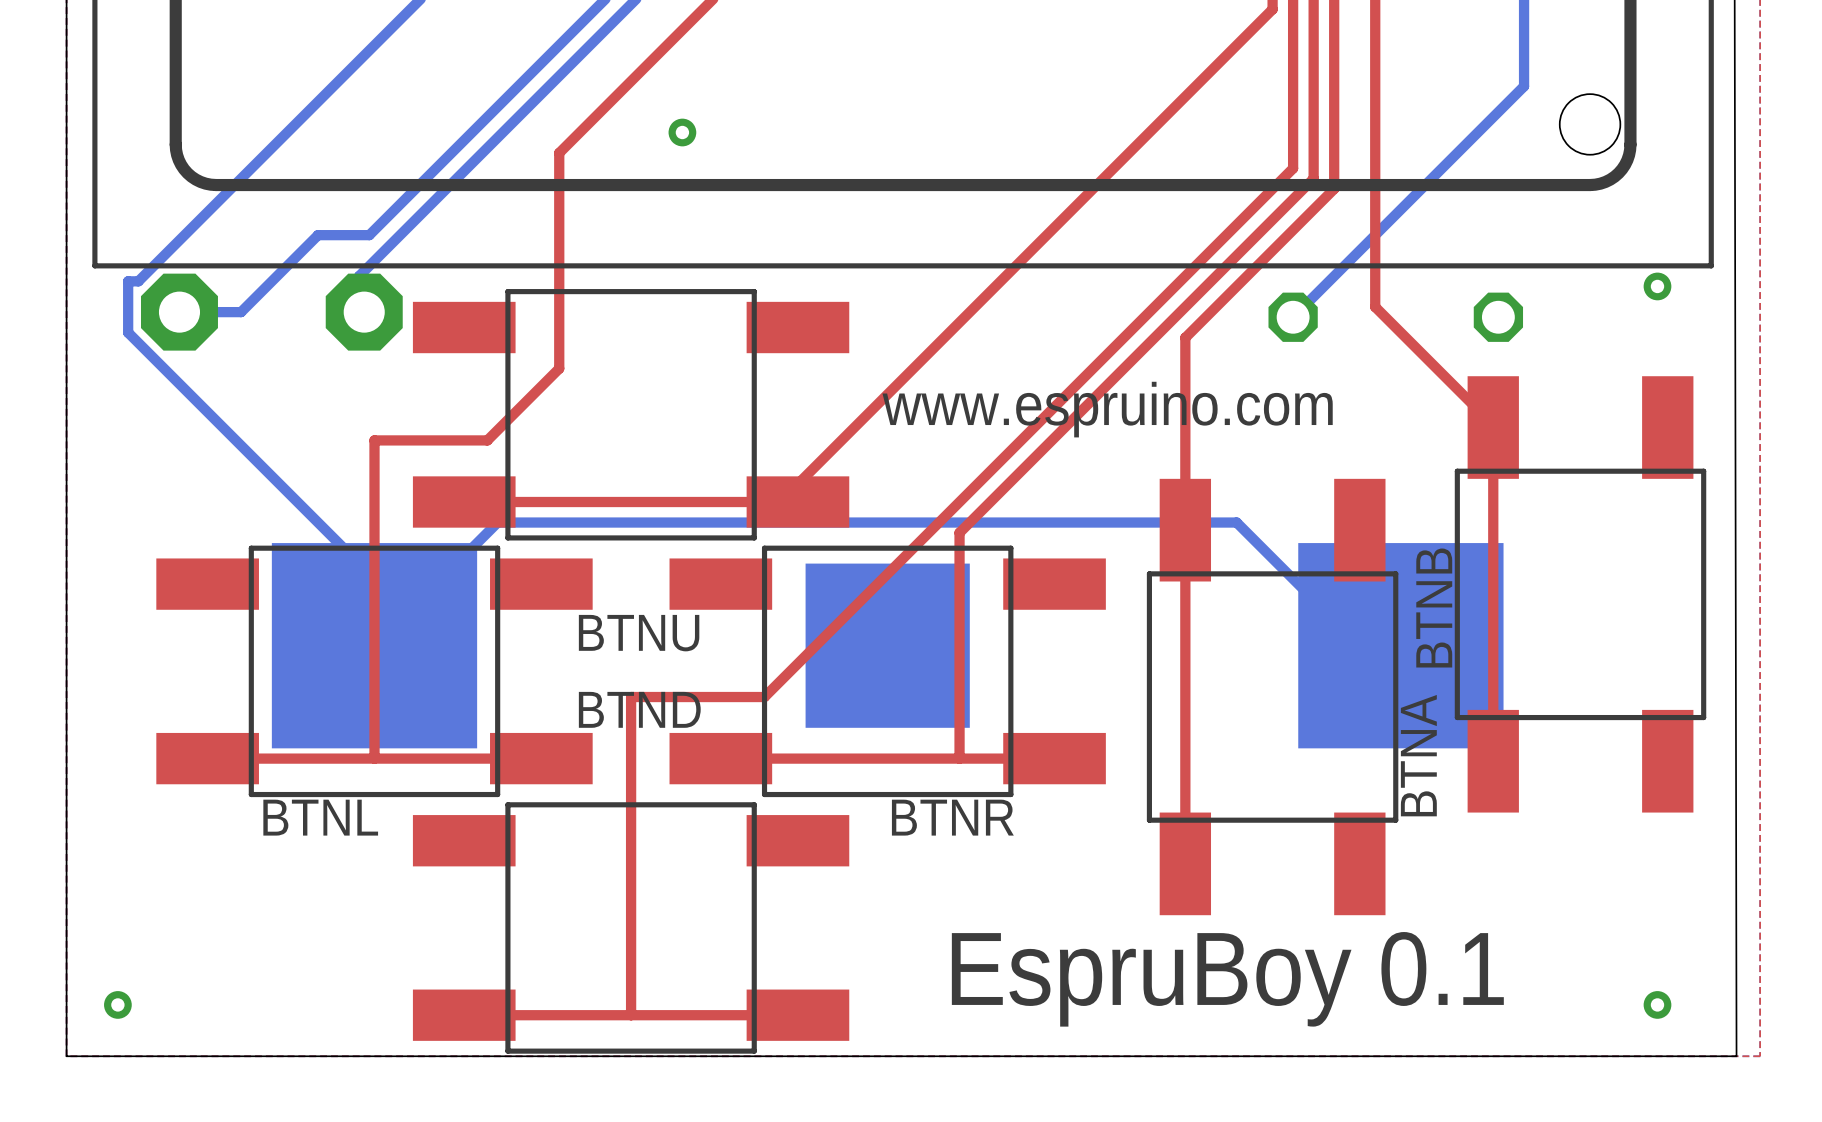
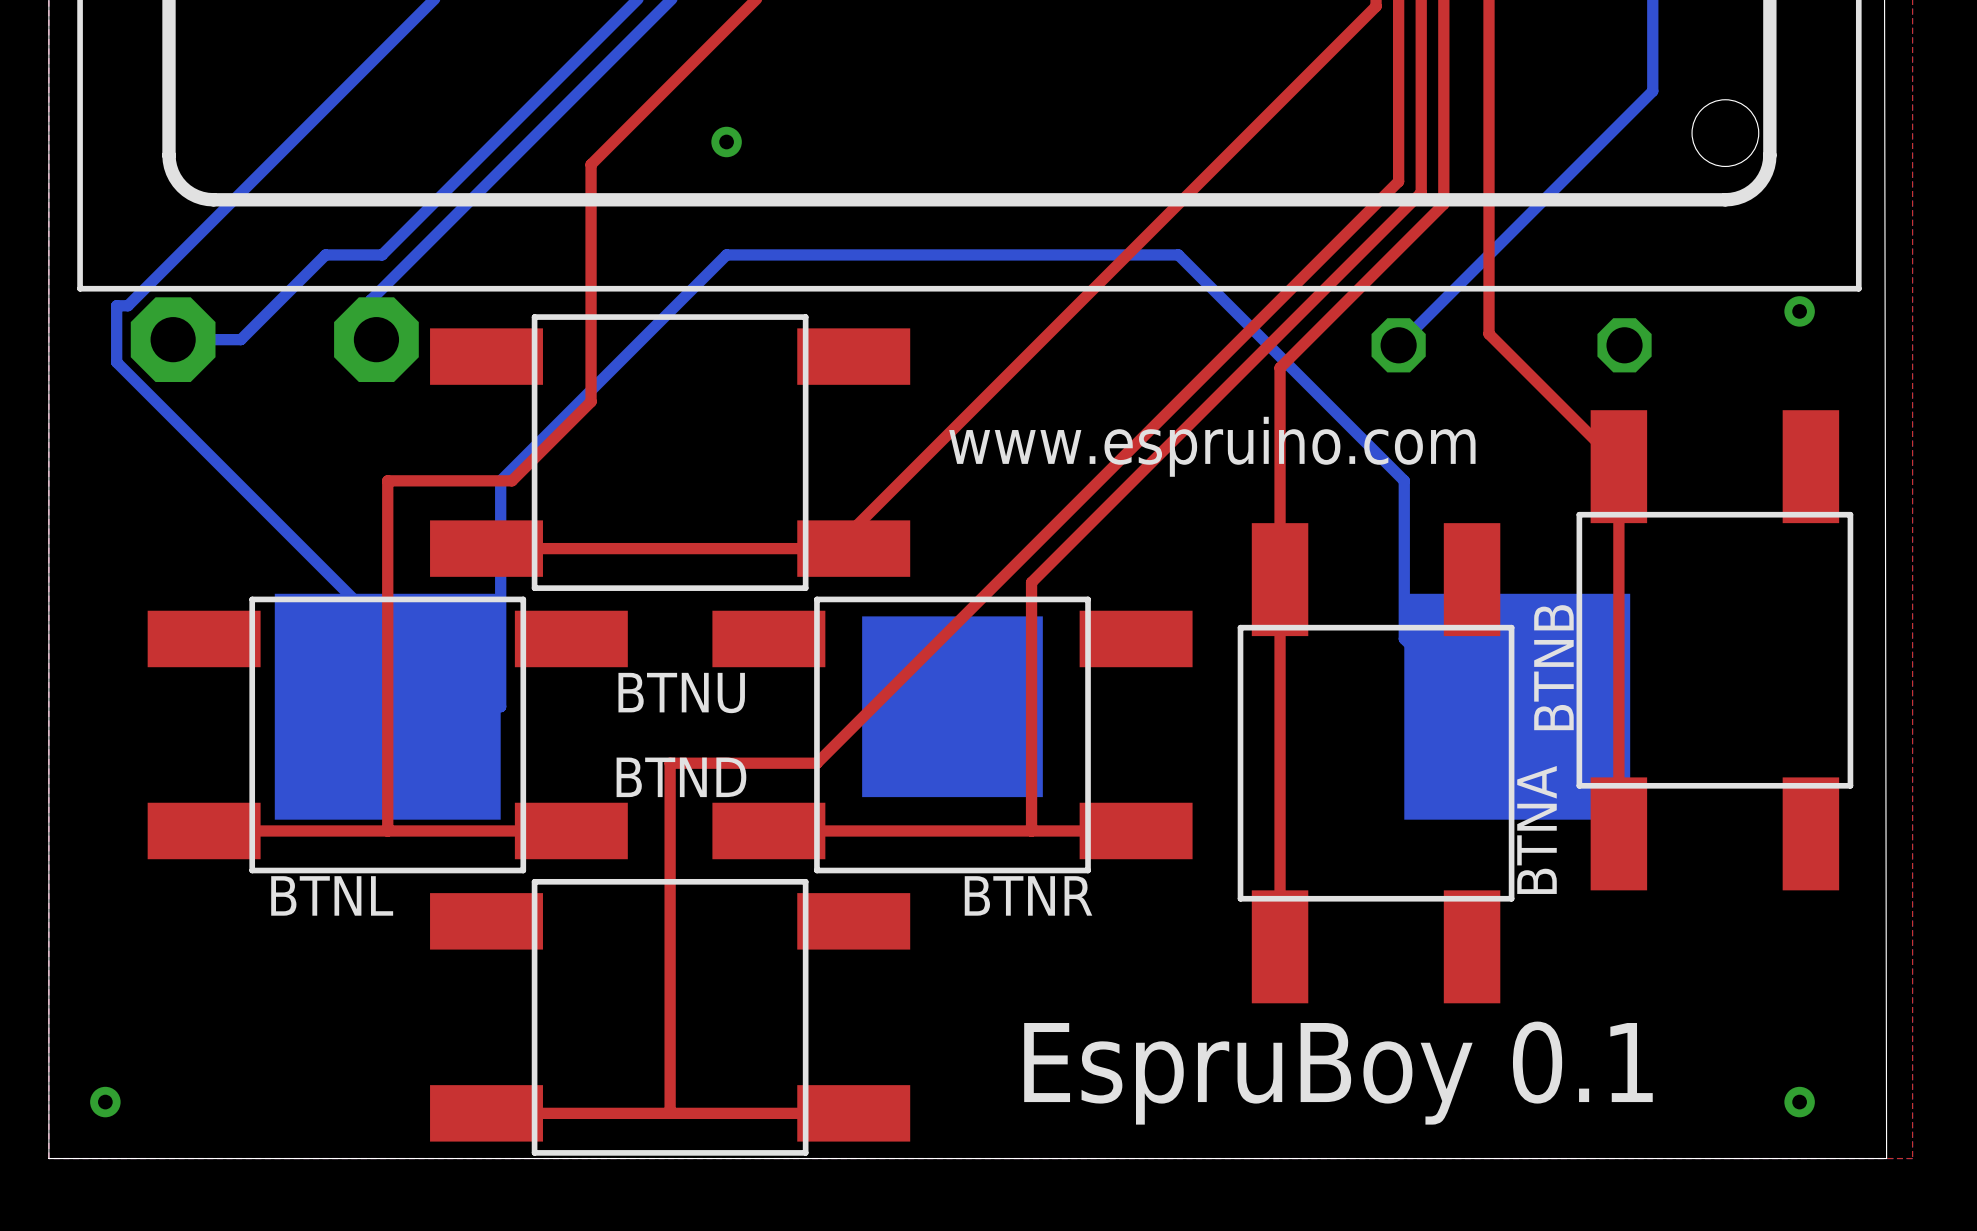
bottom track: (1298, 584) (1236, 522) (497, 522) (374, 645) -> (1404, 638) (1404, 480) (1178, 254) (726, 254) (500, 480) (500, 706) (387, 706)

